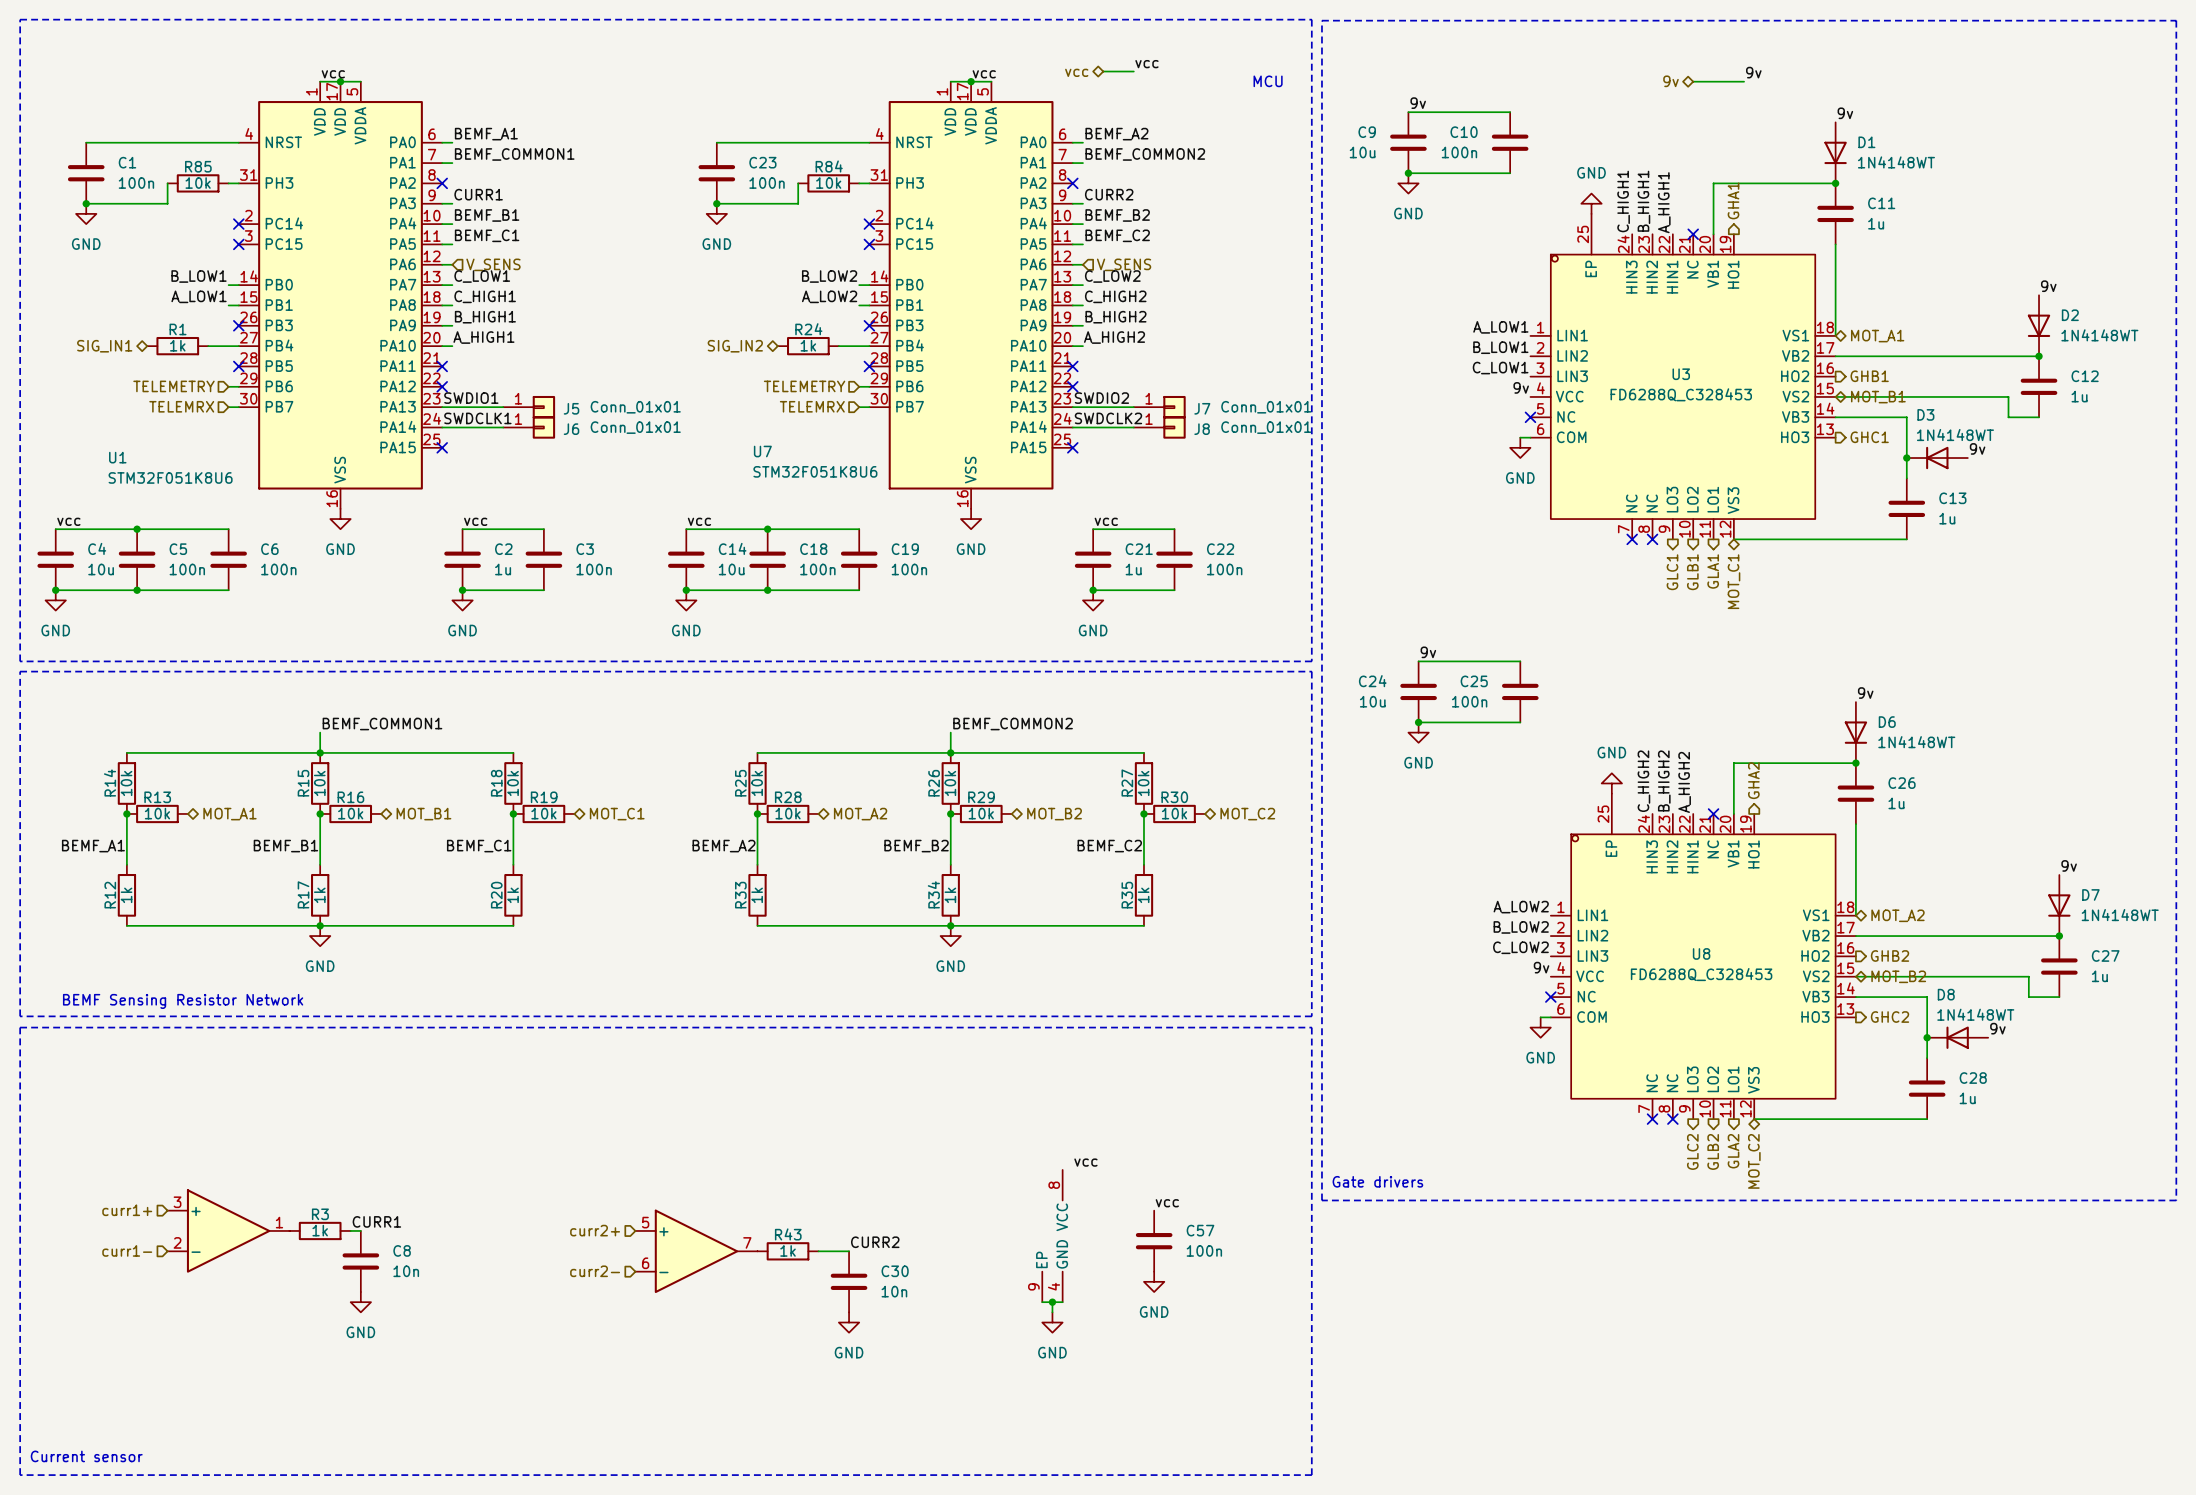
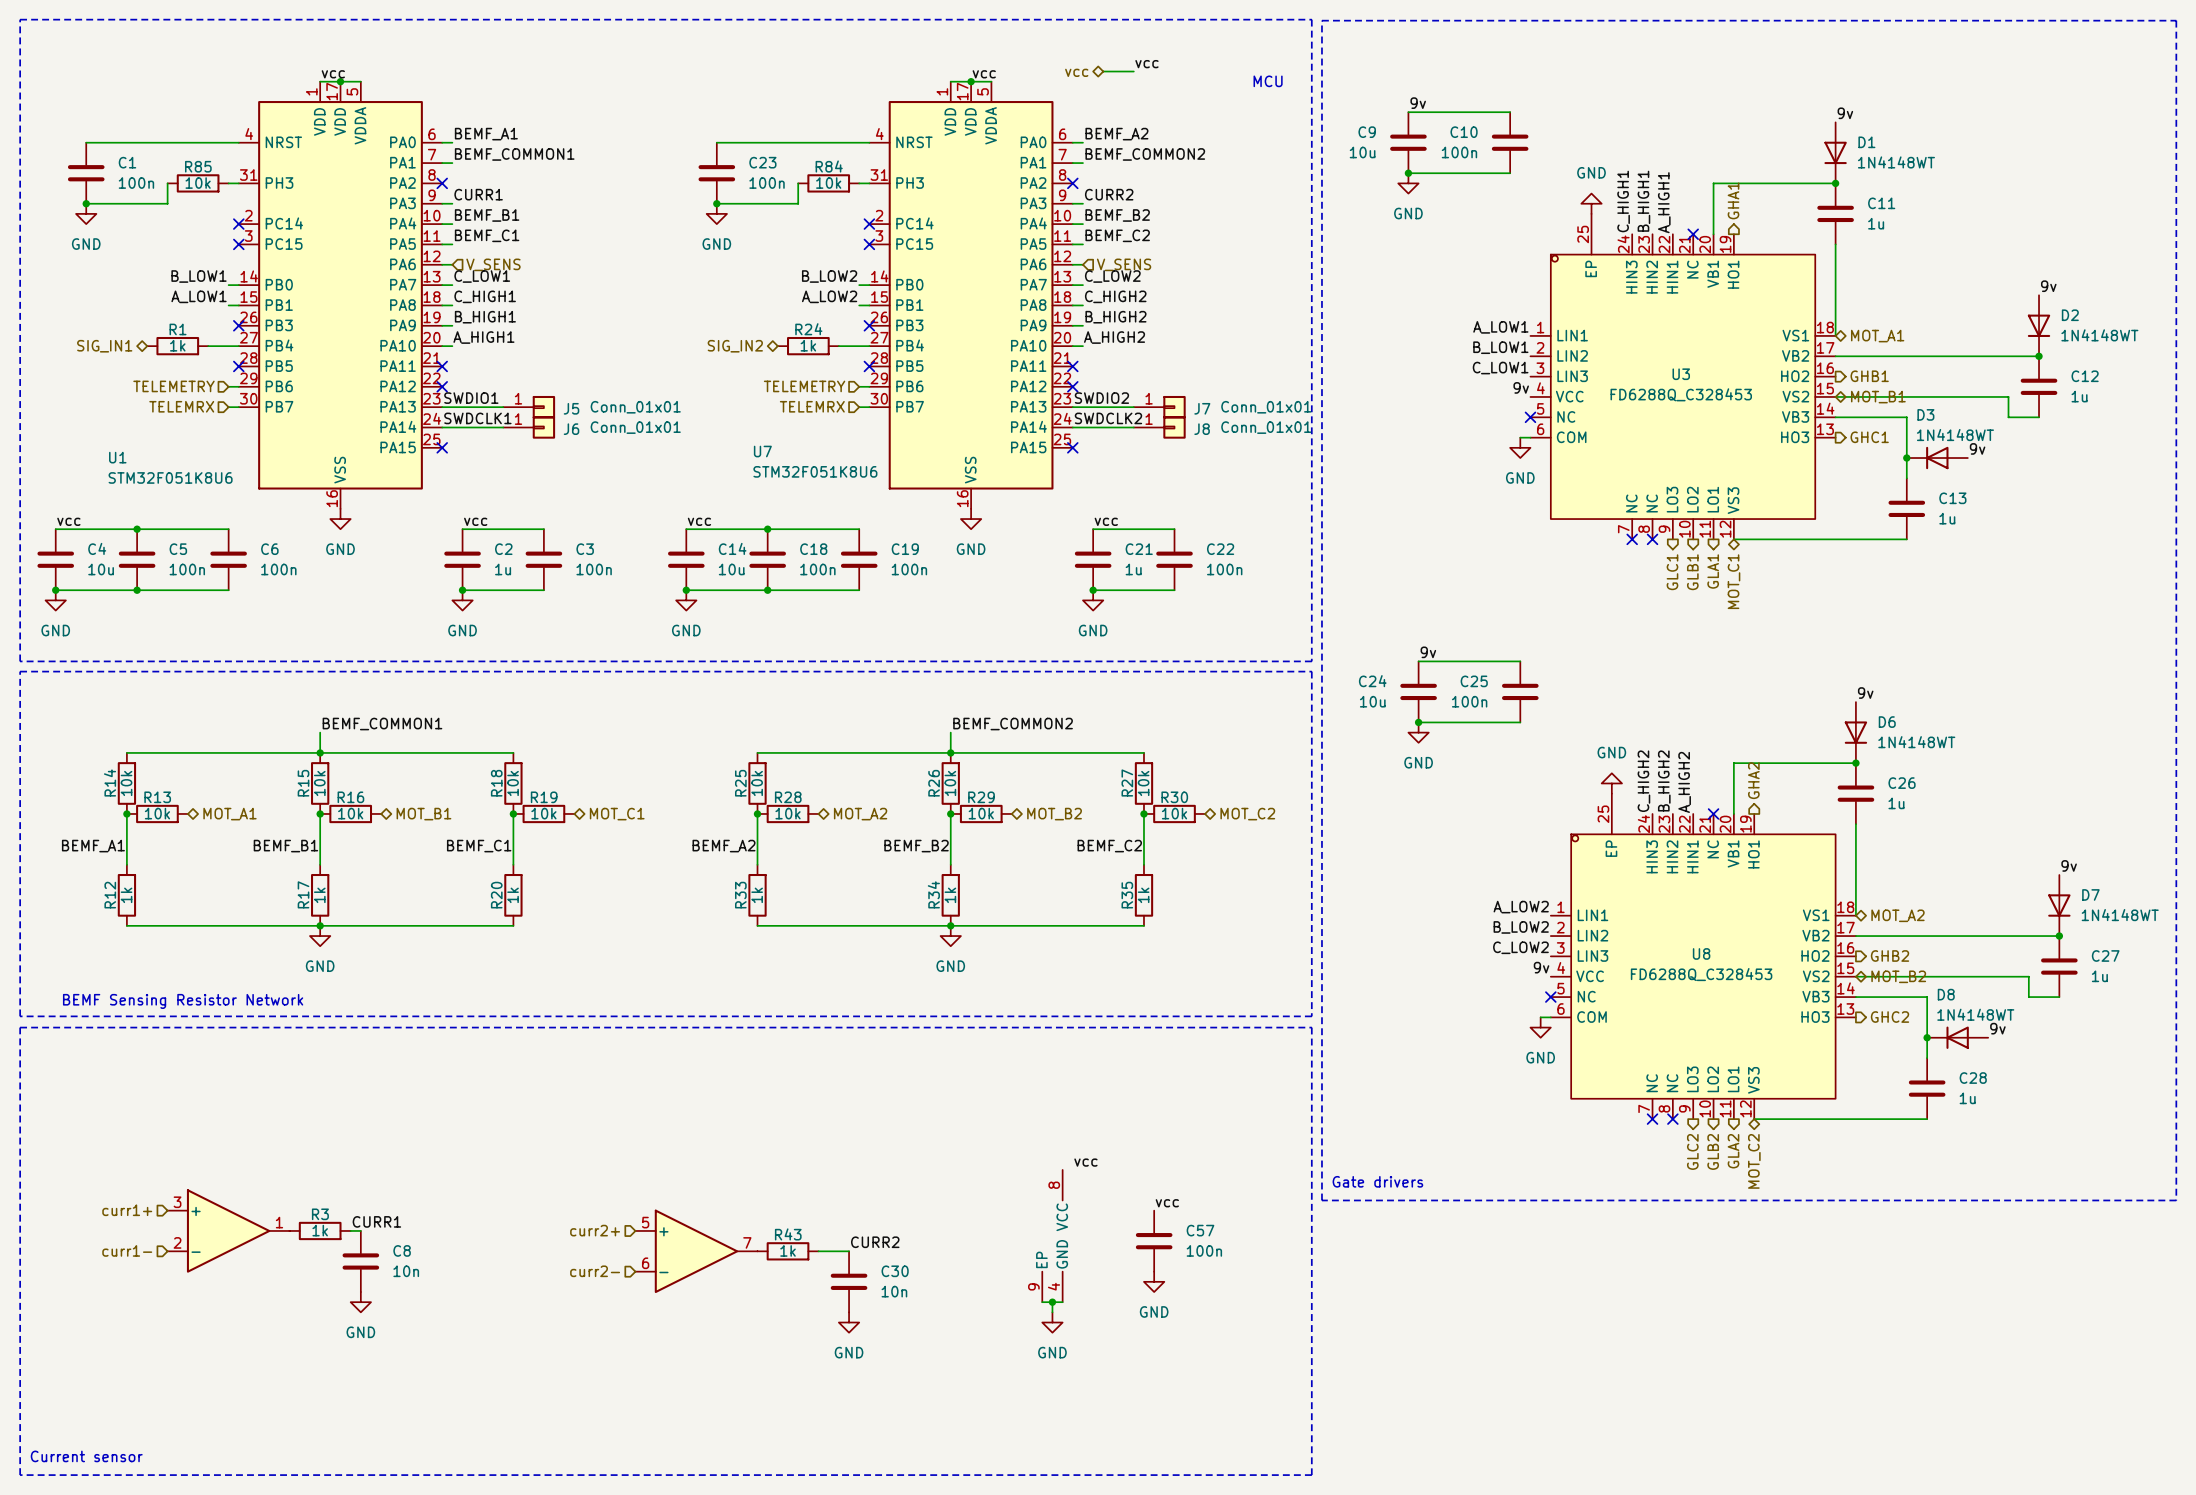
label: 9v (1753, 72) -> none
hierarchical label: 9v (1671, 81) -> none
wire: (1693, 81) (1744, 81) -> none

